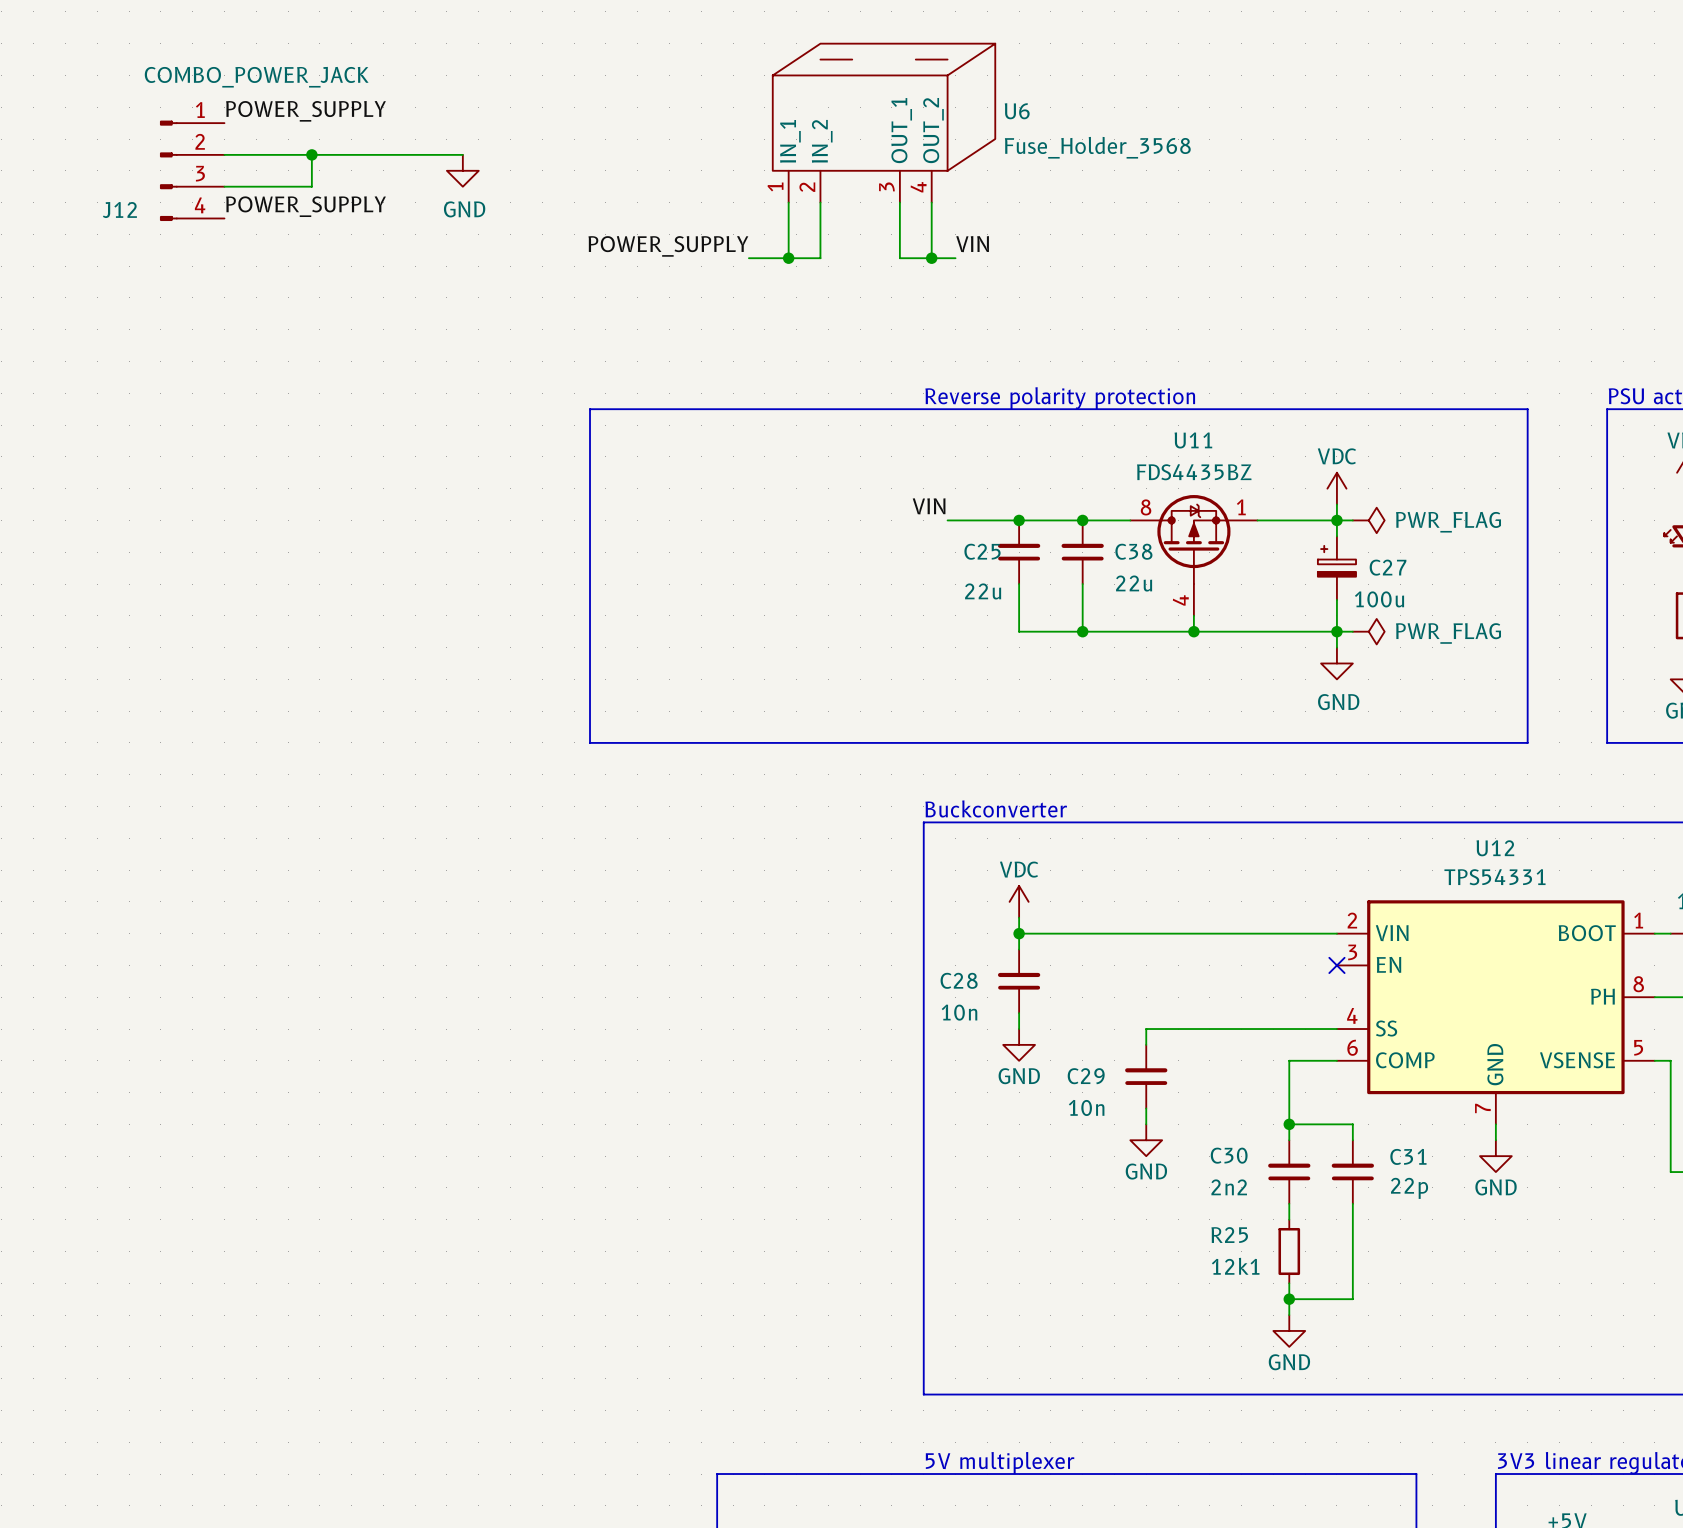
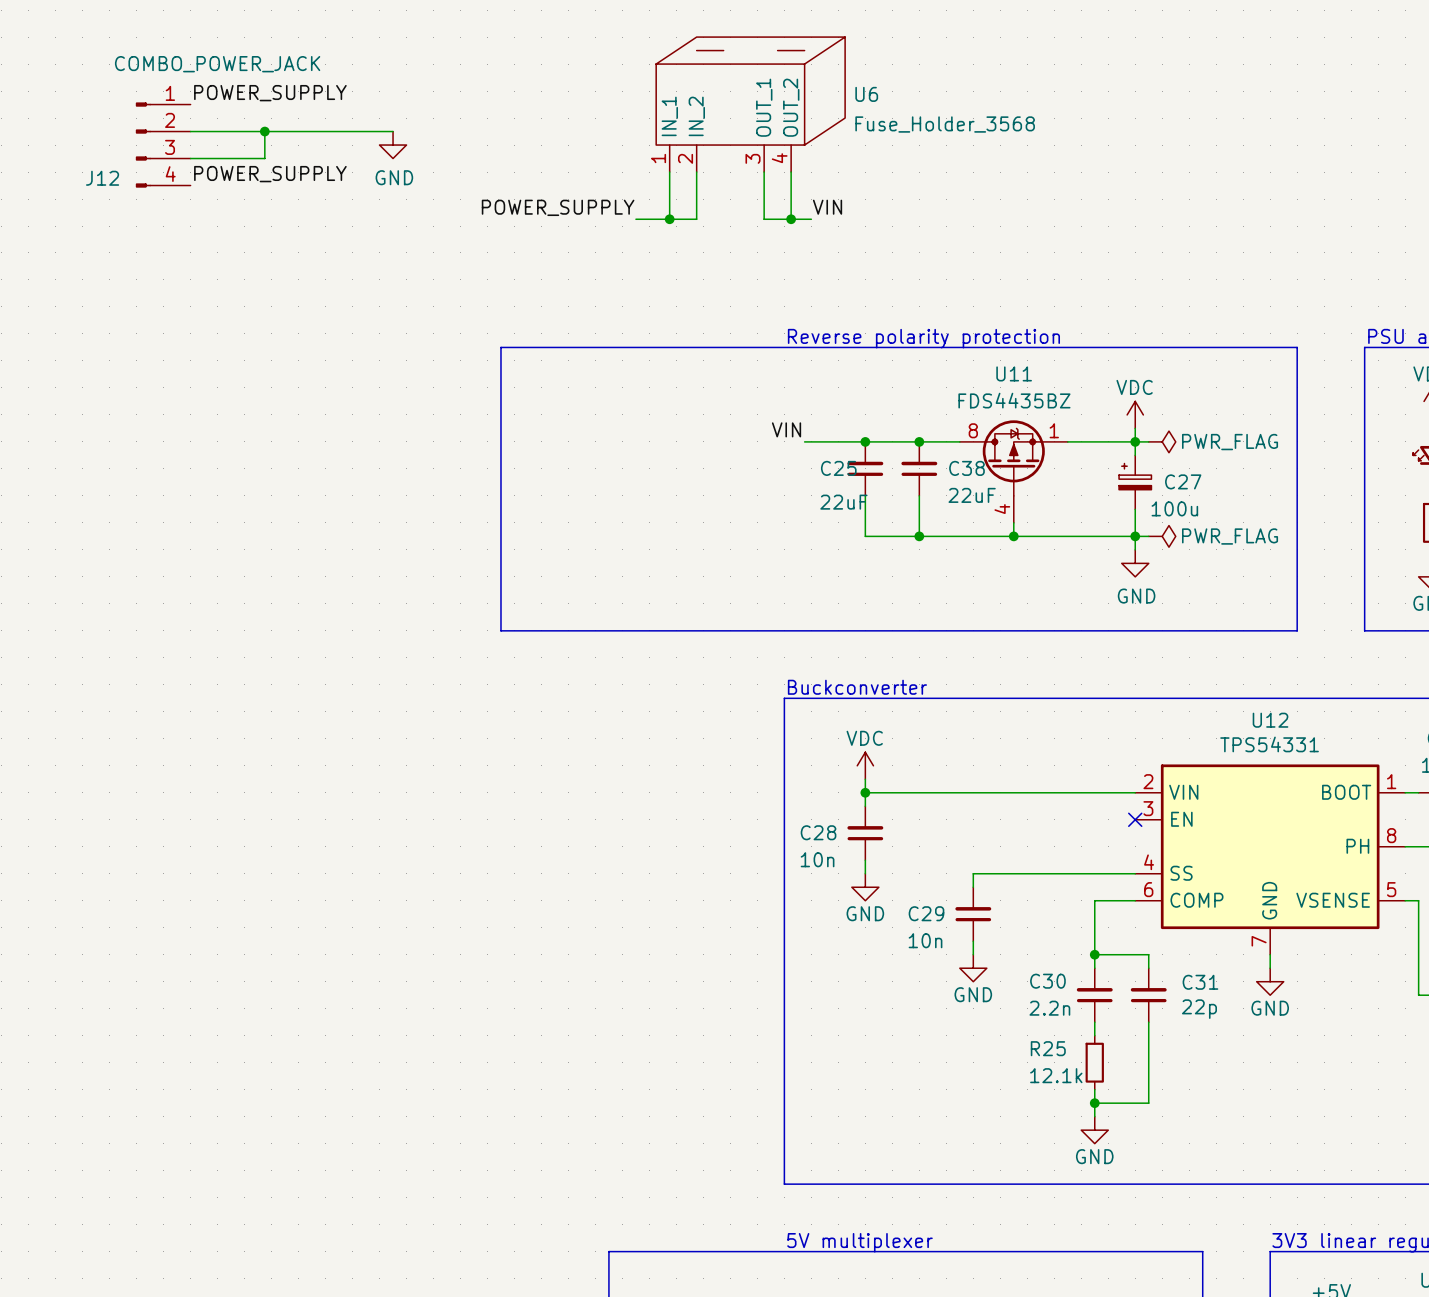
C38 value: 22u (1134, 583) -> 22uF (972, 495)
C25 value: 22u (983, 591) -> 22uF (843, 502)
C30 value: 2n2 (1229, 1187) -> 2.2n (1049, 1008)
R25 value: 12k1 (1235, 1266) -> 12.1k (1056, 1075)

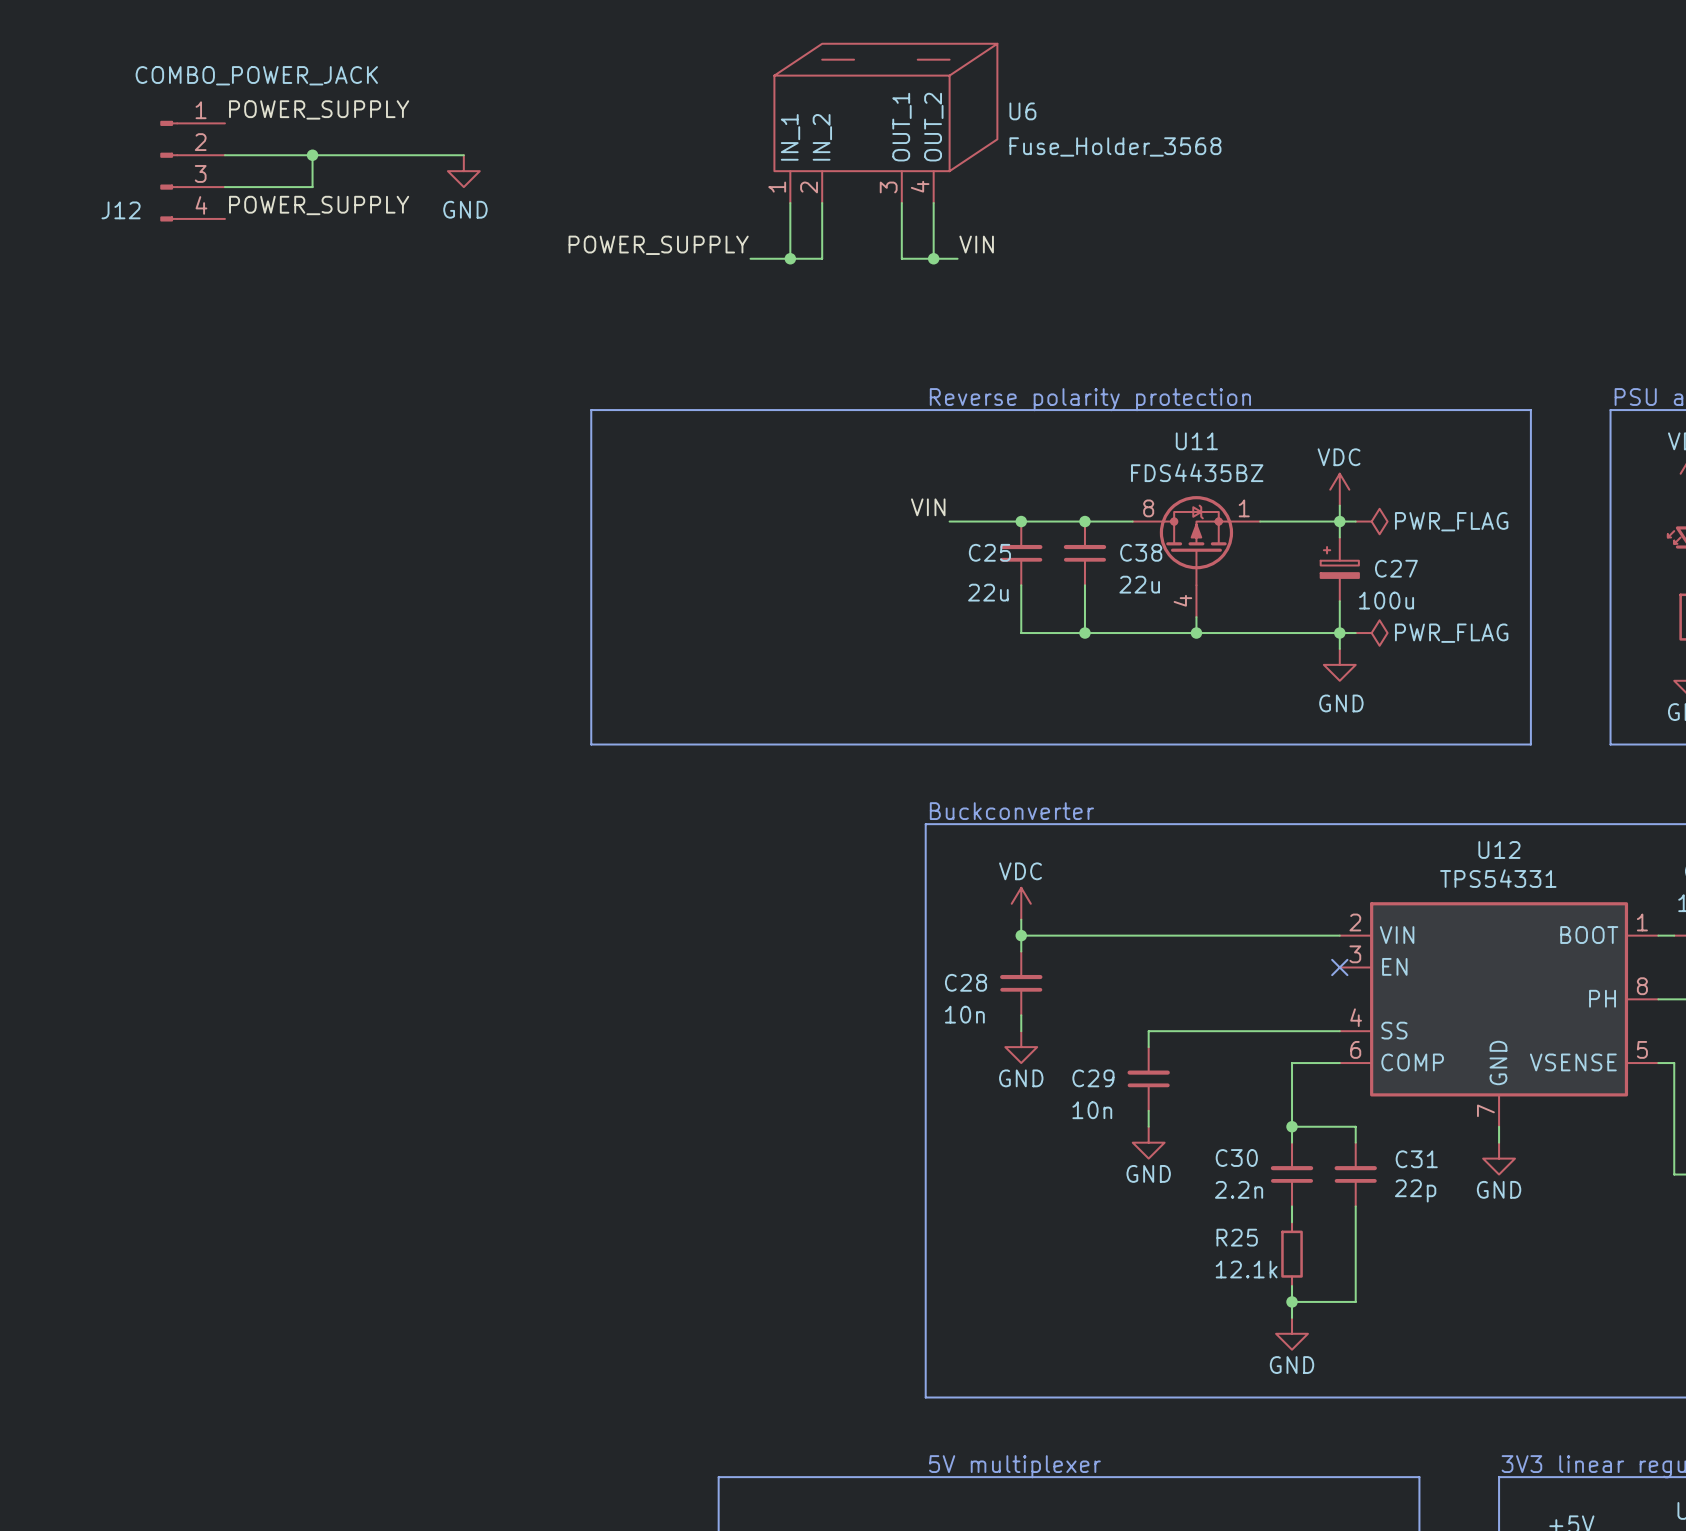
C38 value: 22uF (972, 495) -> 22u (1139, 584)
C25 value: 22uF (843, 502) -> 22u (988, 592)

